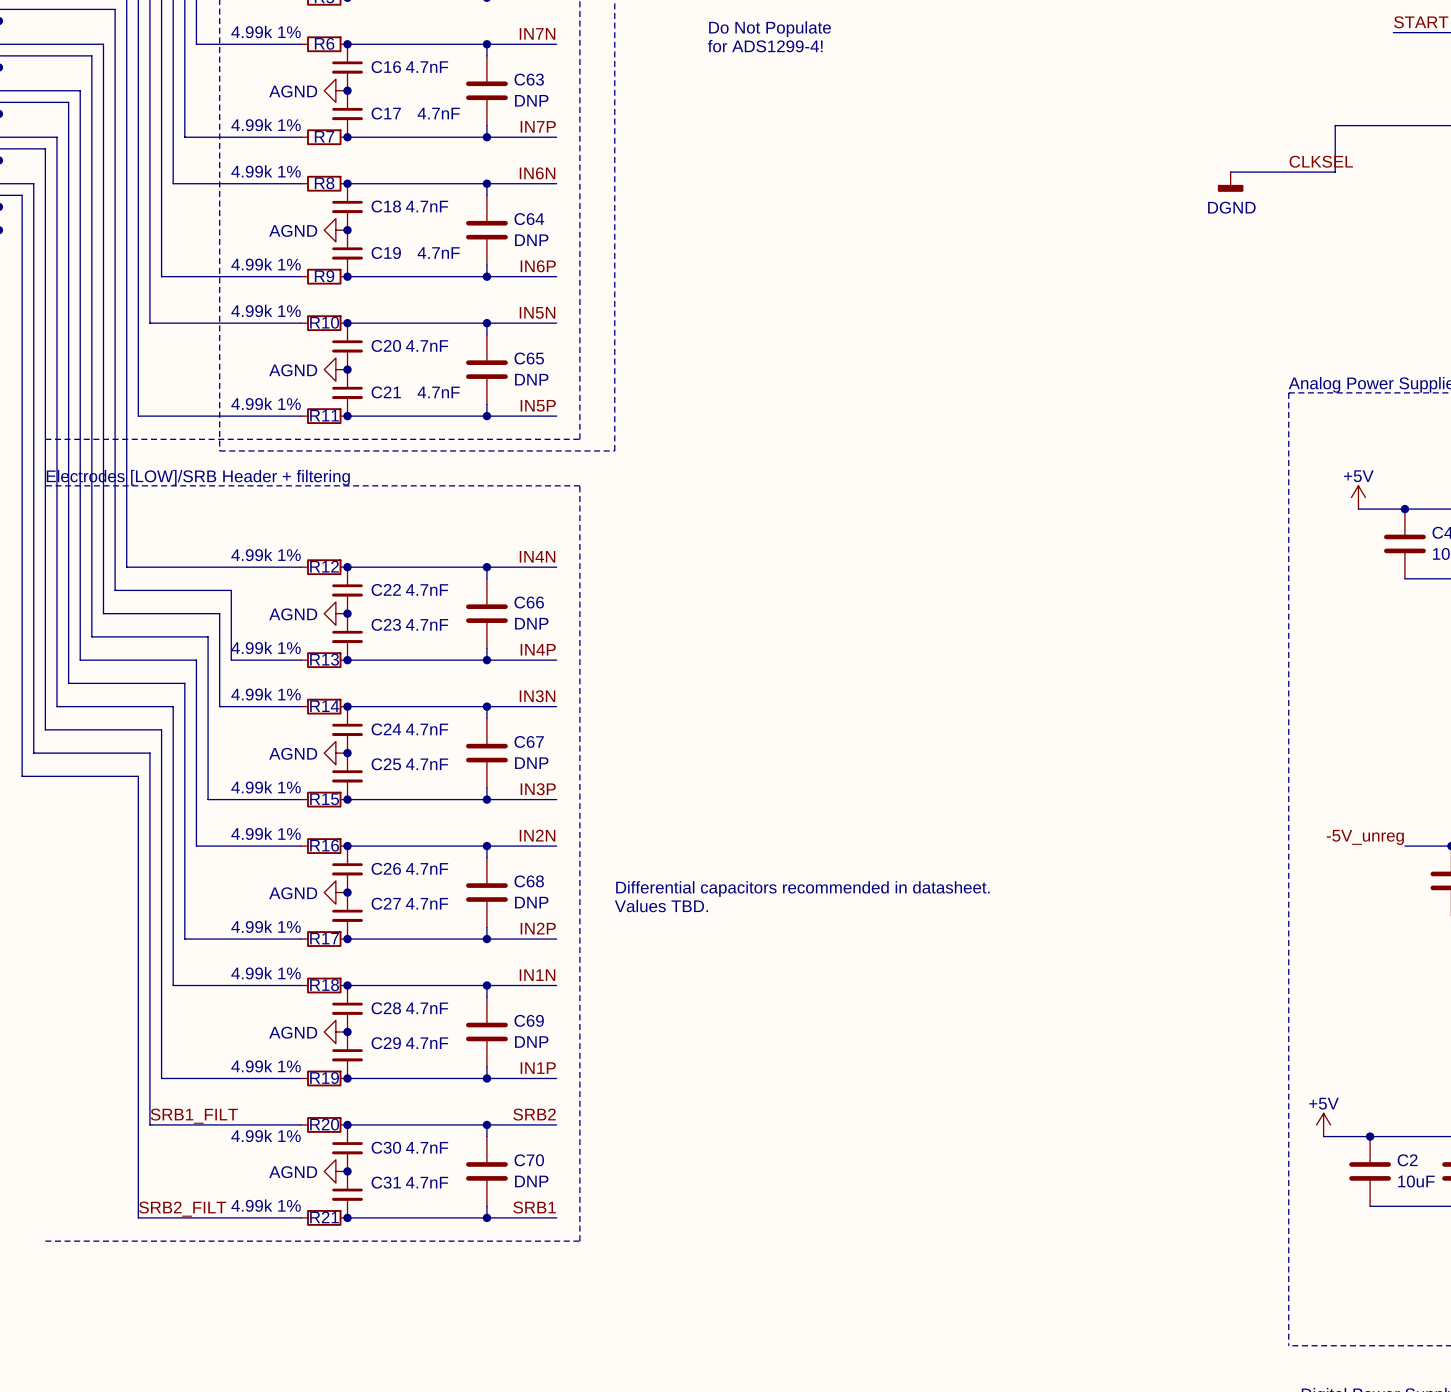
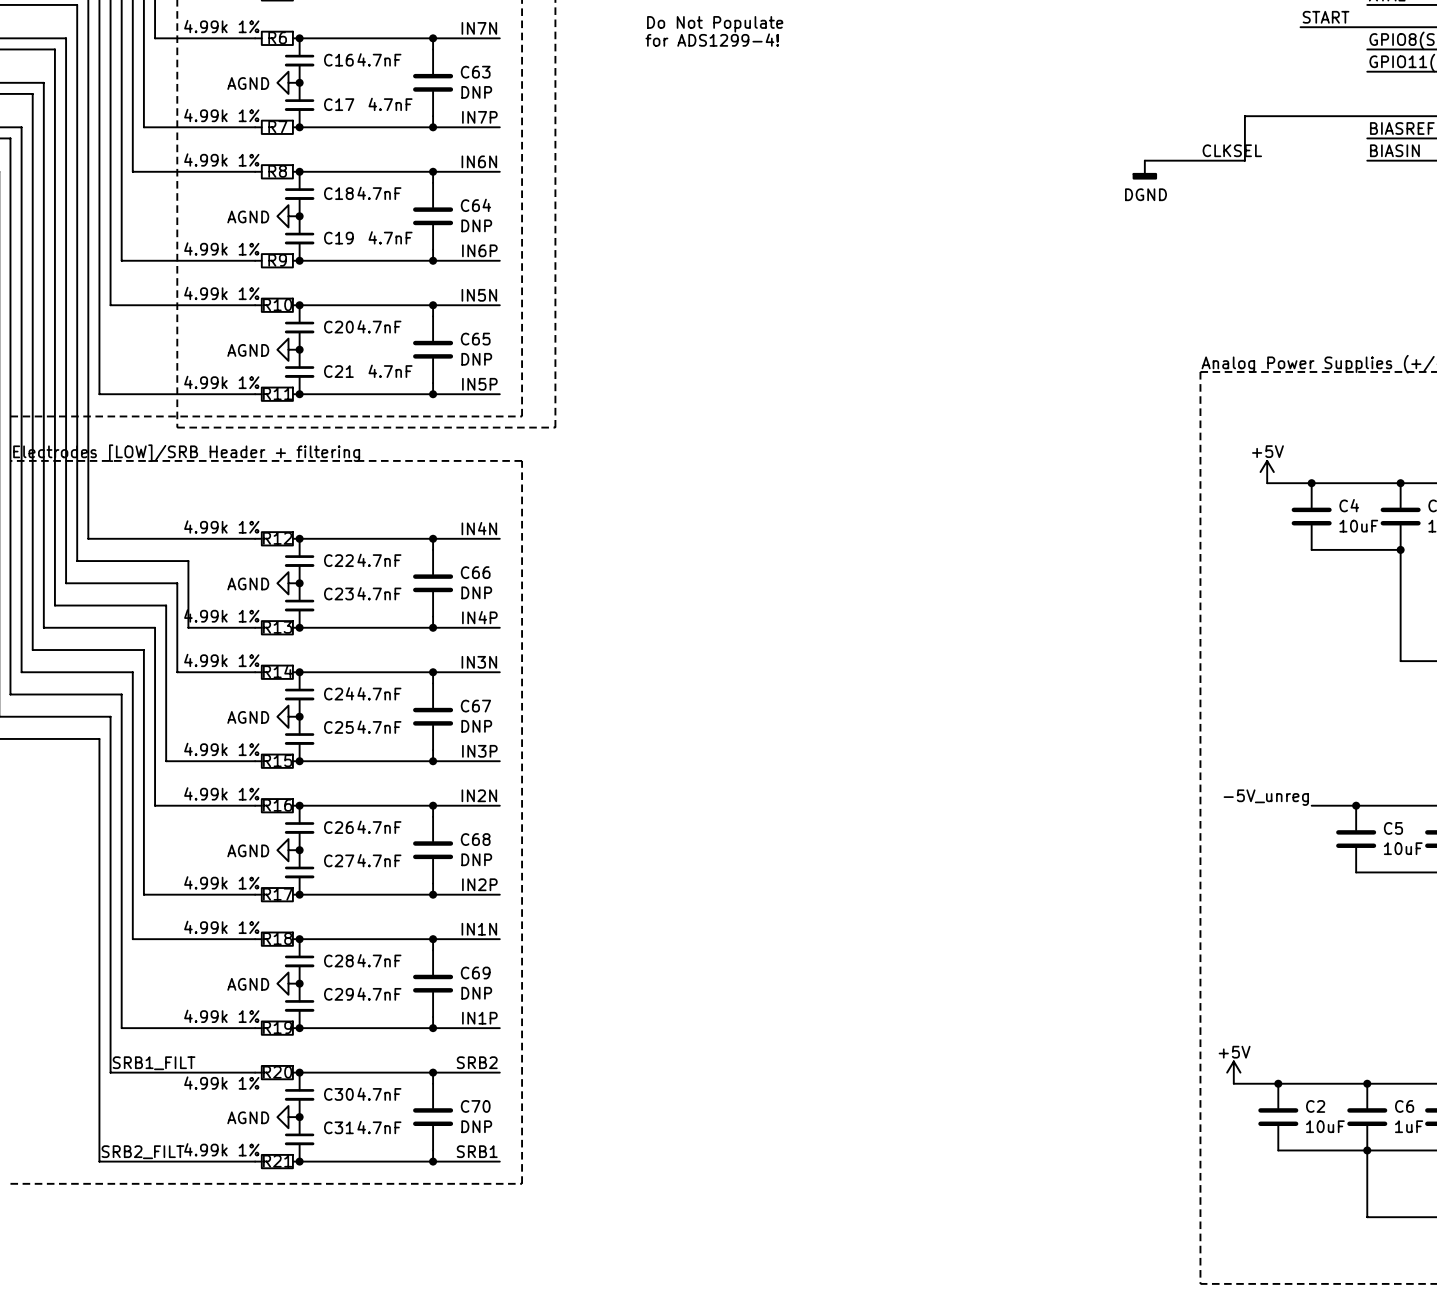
text: Differential capacitors recommended in datasheet. (802, 889) -> none
text: Values TBD. (661, 906) -> none

